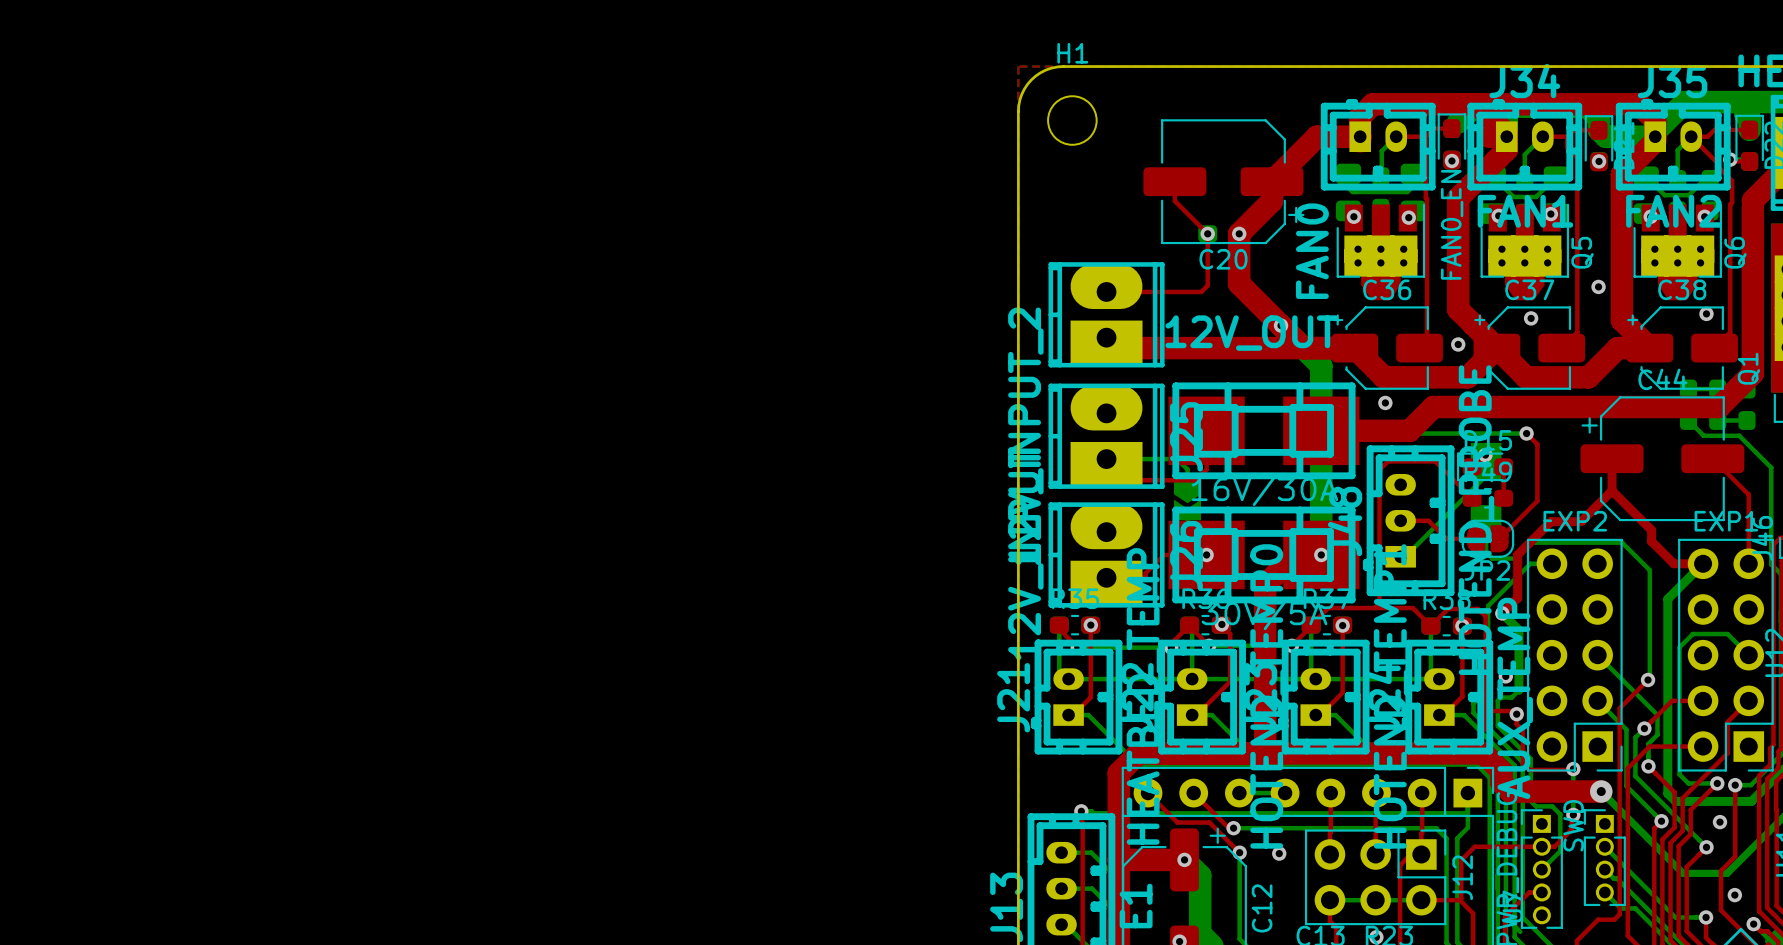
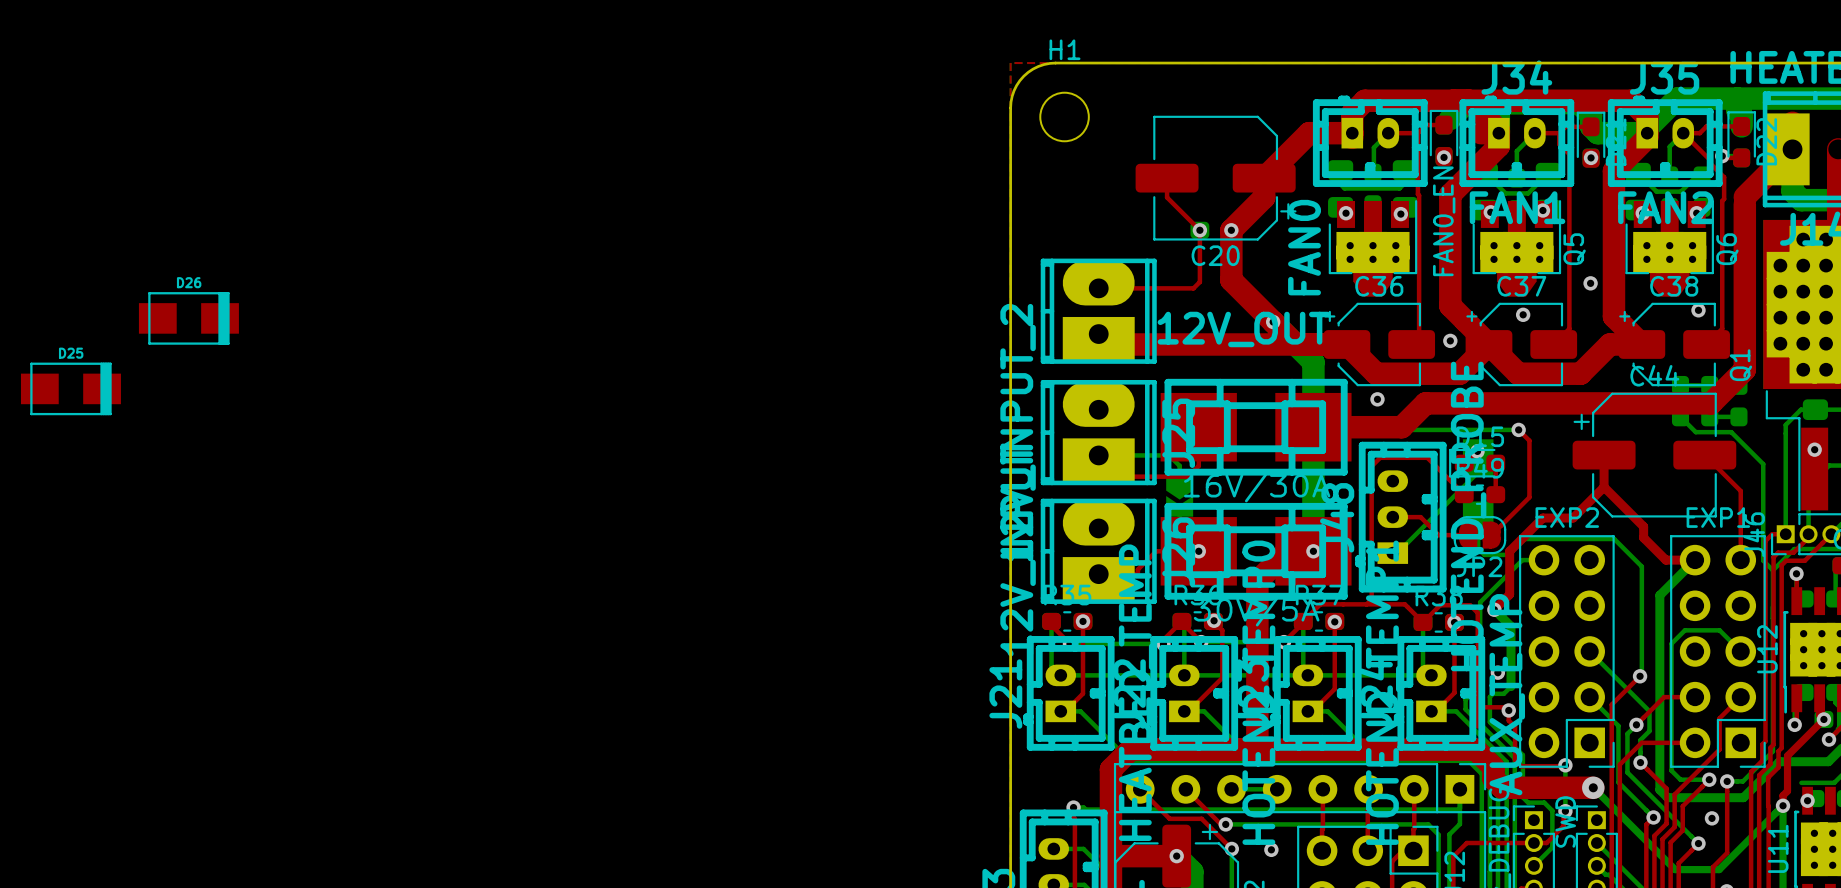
D26: none -> (188, 318)
D25: none -> (70, 388)

